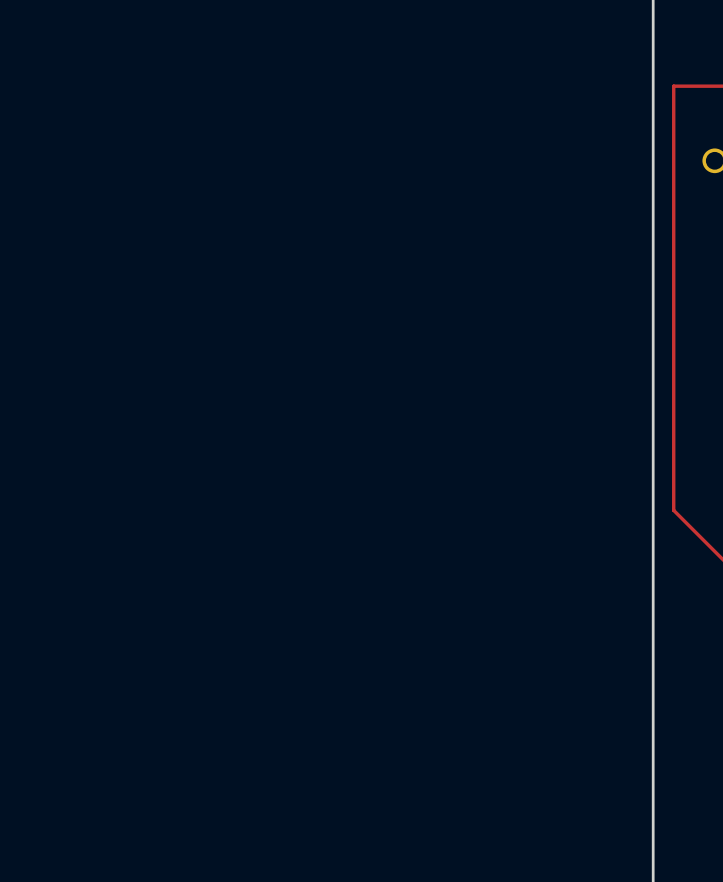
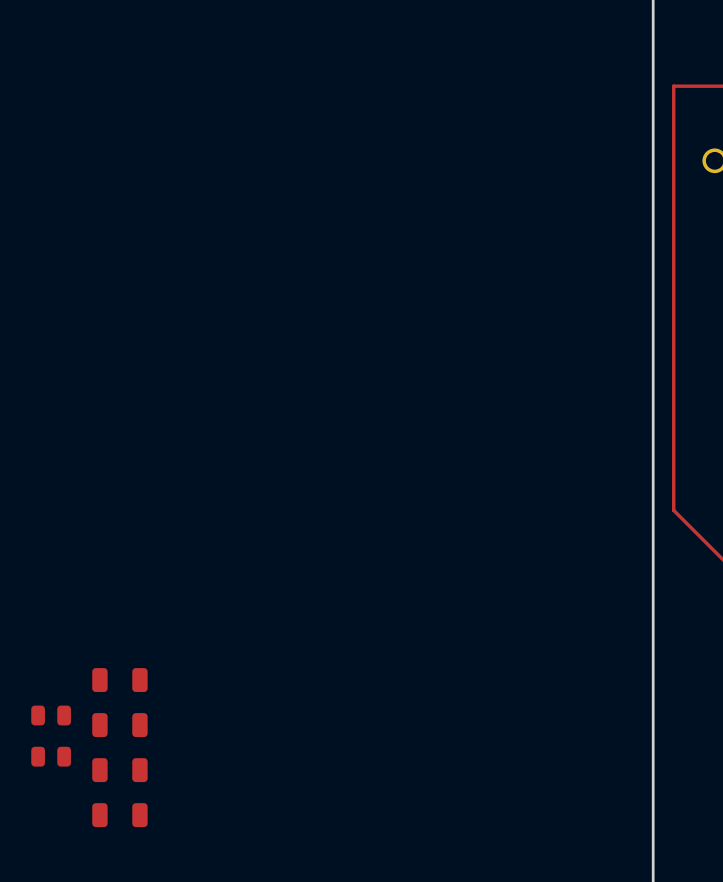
part: none -> (119, 680)
part: none -> (51, 715)
part: none -> (119, 725)
part: none -> (51, 756)
part: none -> (119, 770)
part: none -> (119, 815)

